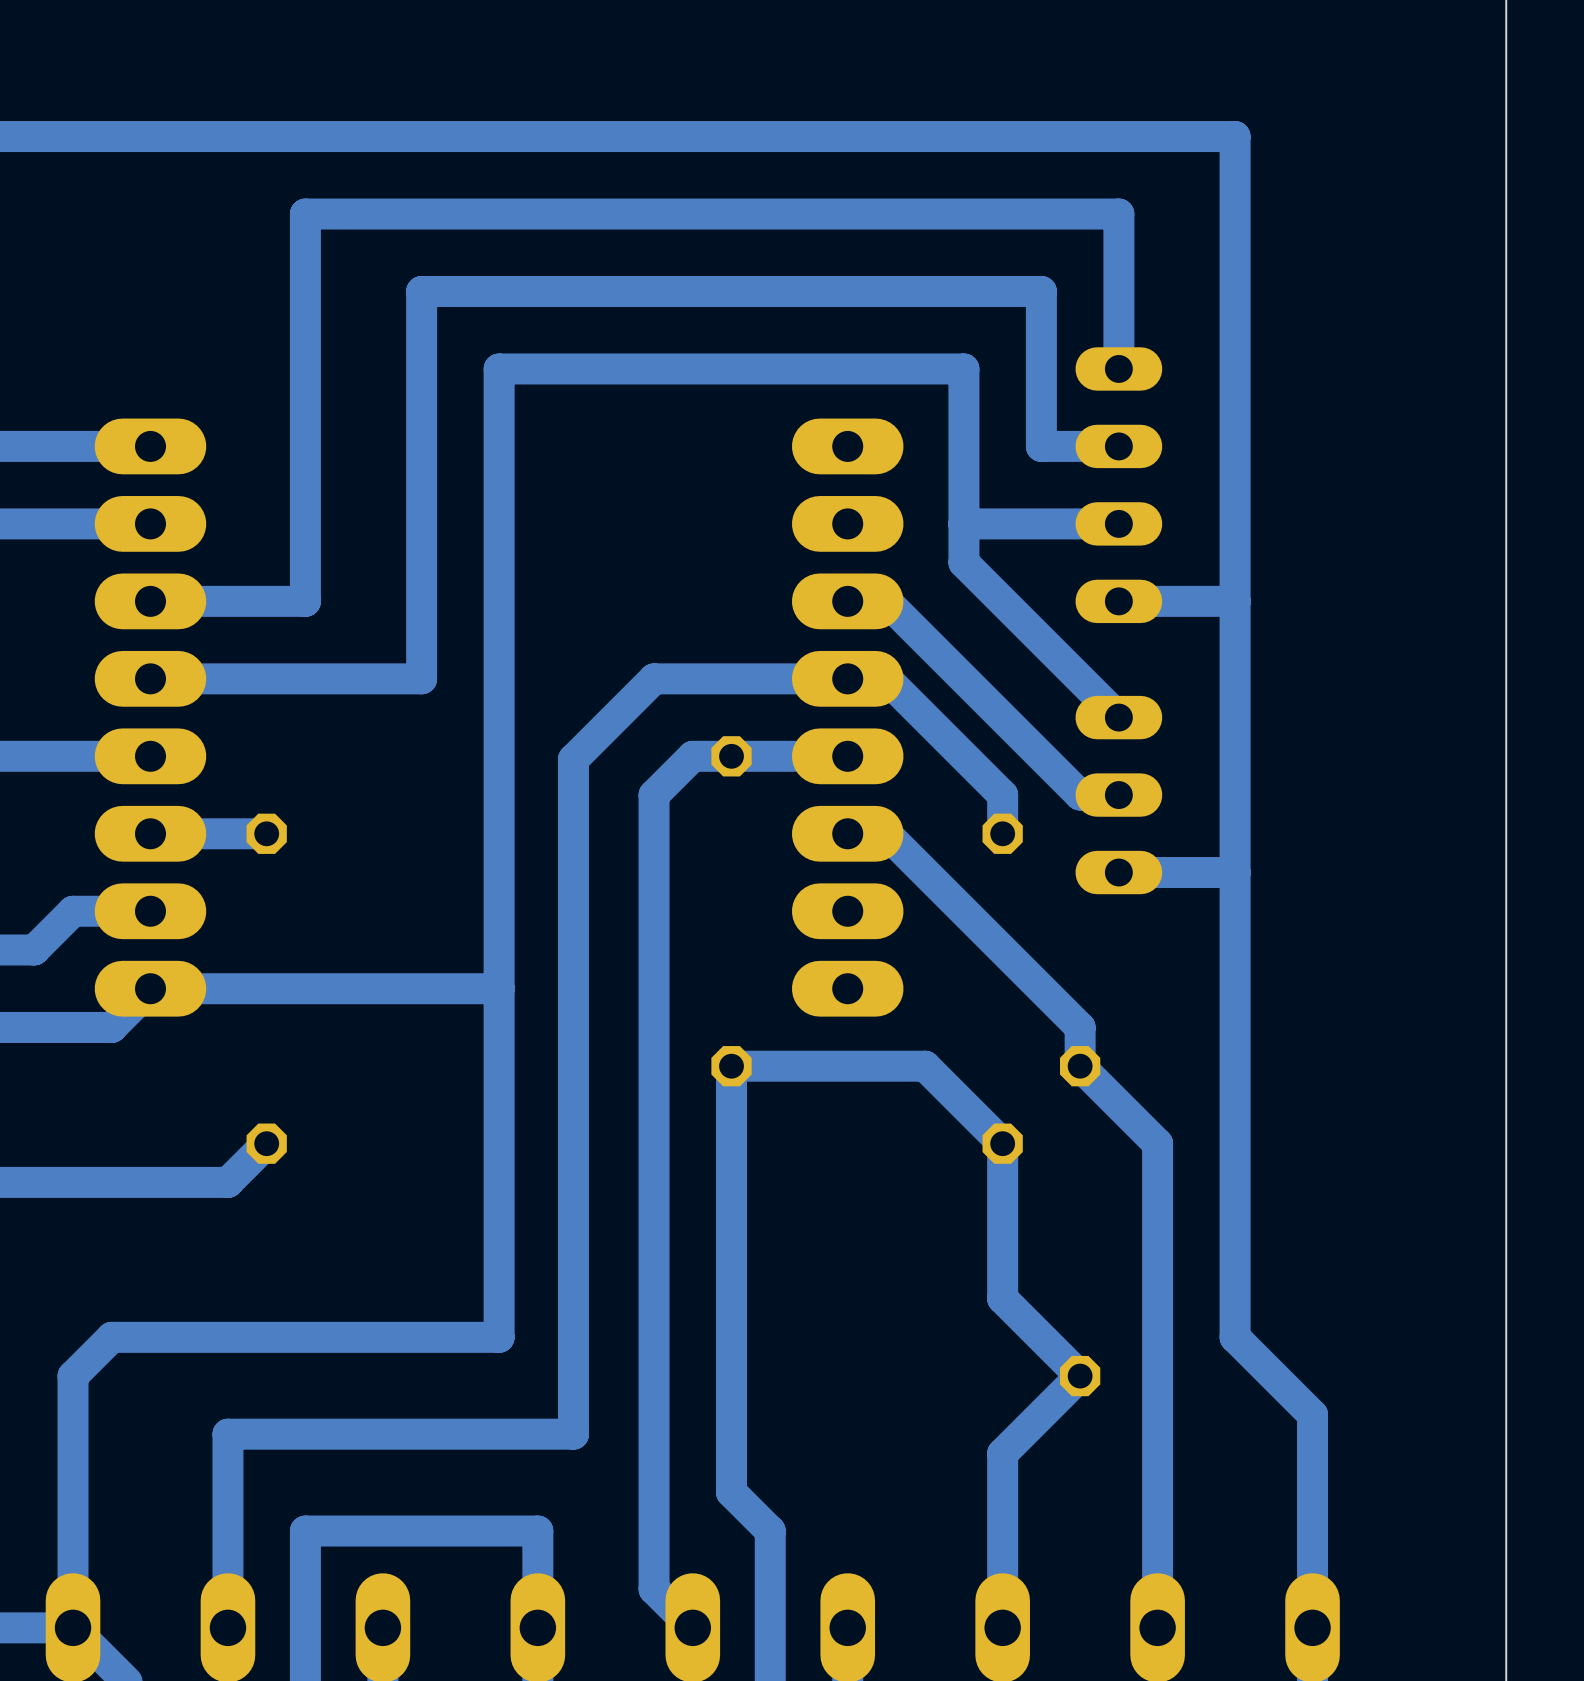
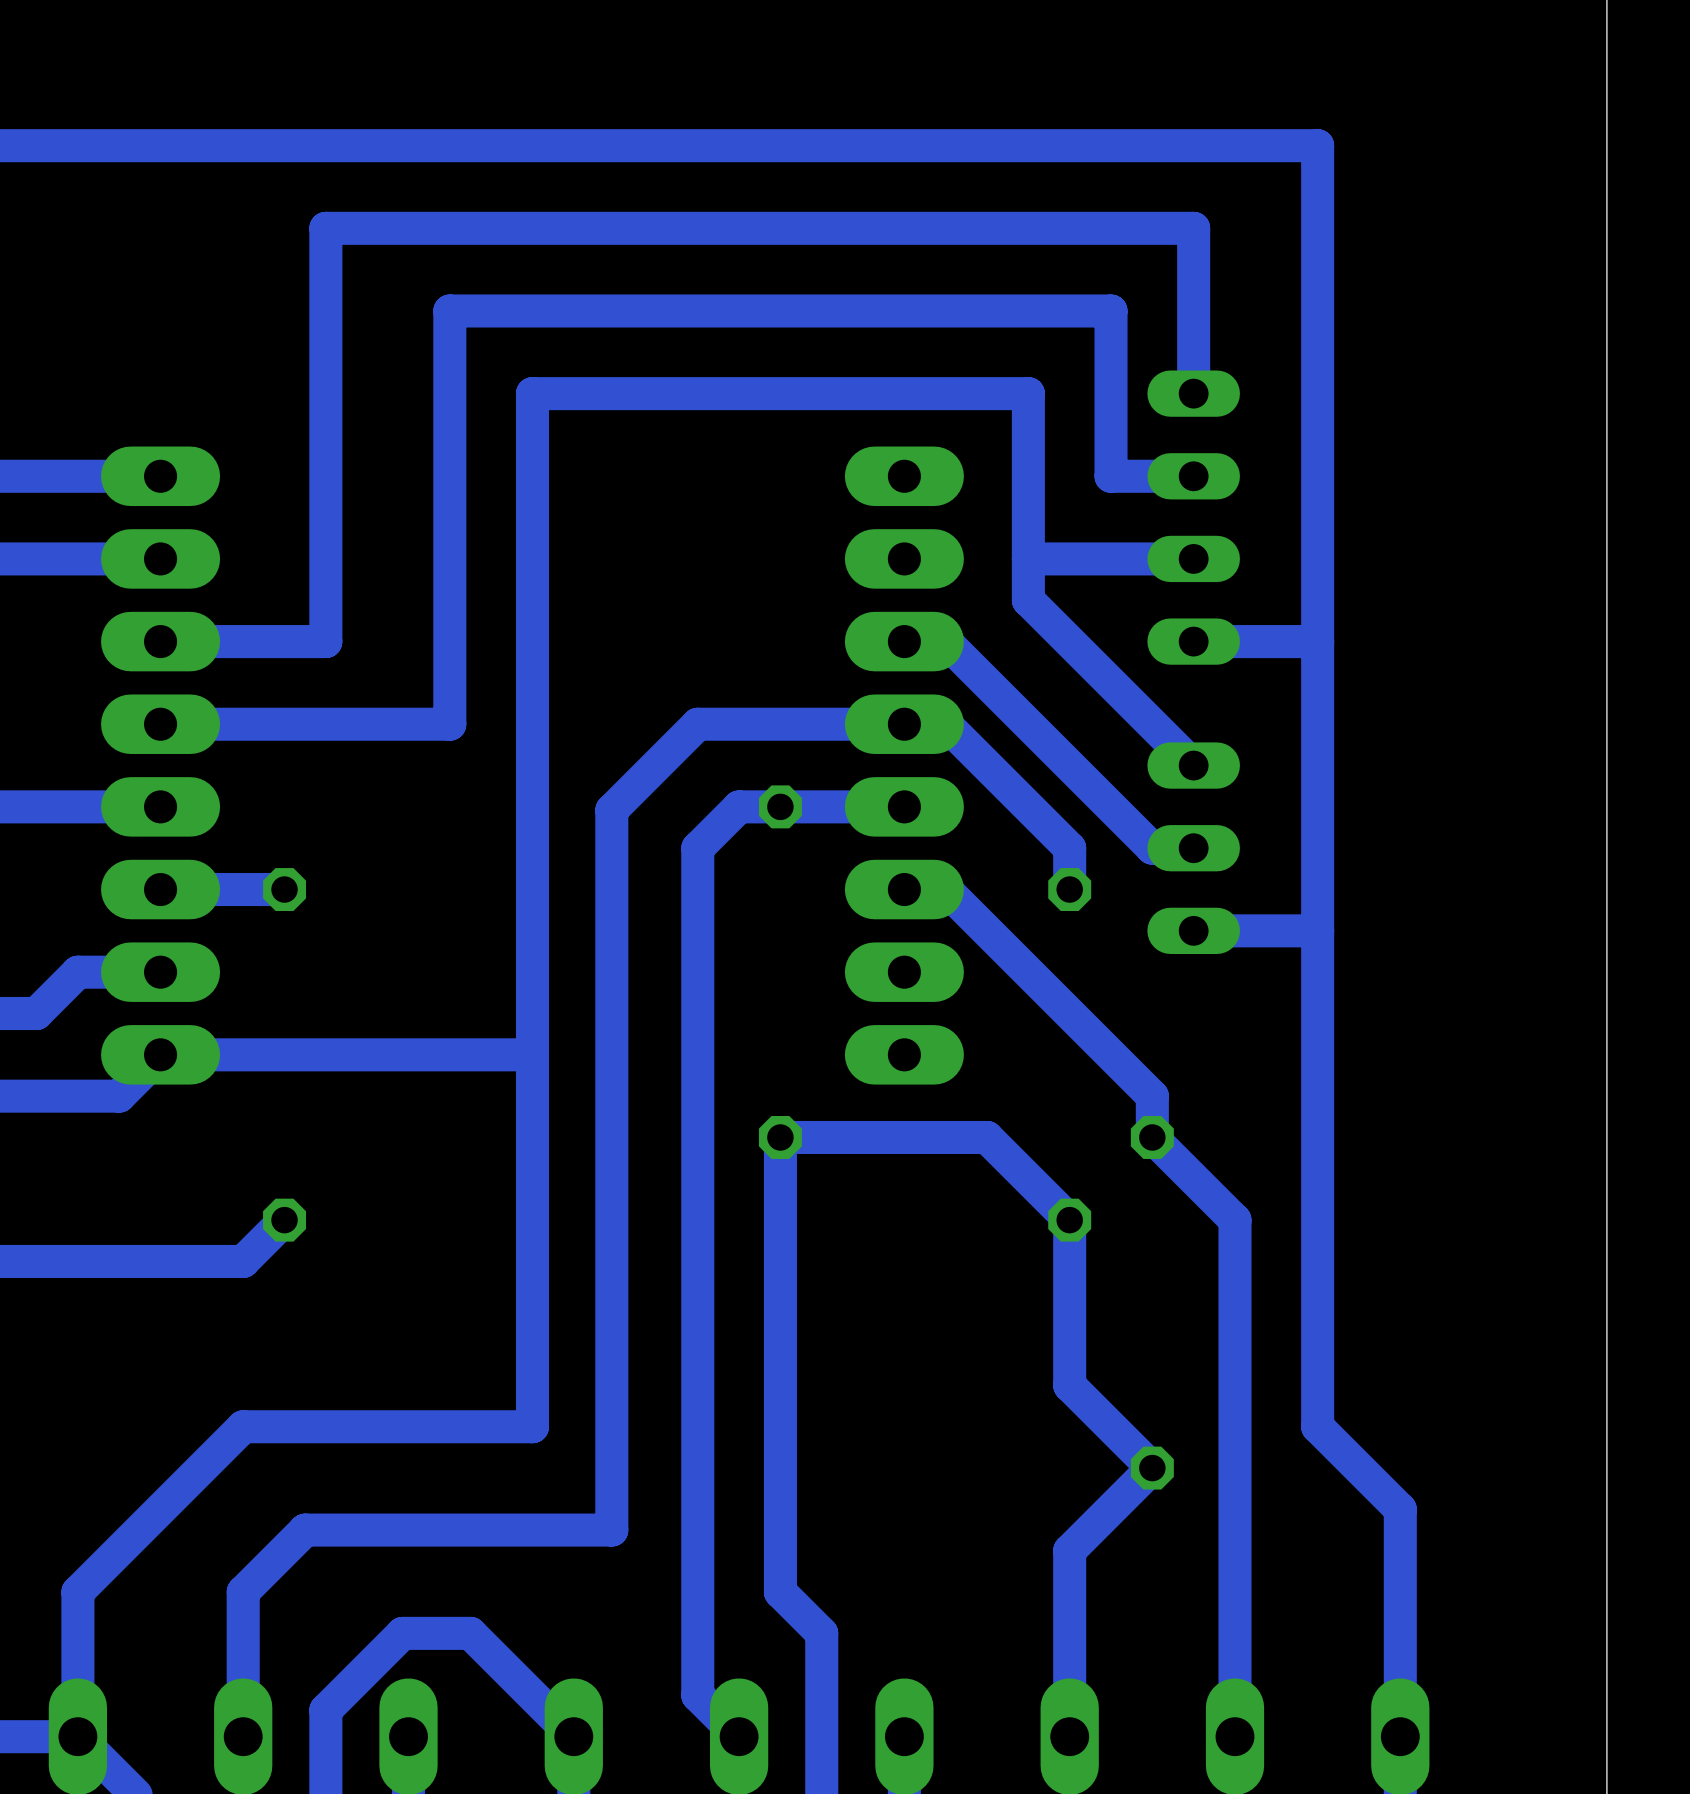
track: (227, 1337) (111, 1337) (73, 1376) (73, 1492) -> (243, 1426) (77, 1592)
track: (286, 1434) (227, 1434) (227, 1492) -> (305, 1530) (243, 1592)
track: (377, 1531) (305, 1531) (305, 1602) -> (402, 1633) (325, 1710)
track: (441, 1531) (537, 1531) (537, 1627) -> (470, 1633) (573, 1736)

